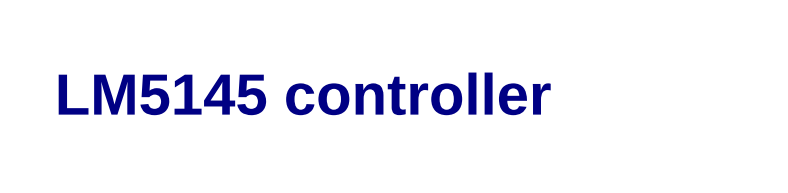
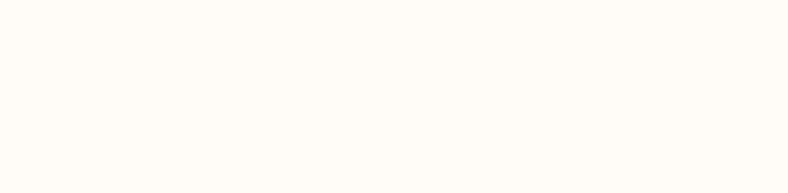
text: LM5145 controller (304, 93) -> none

